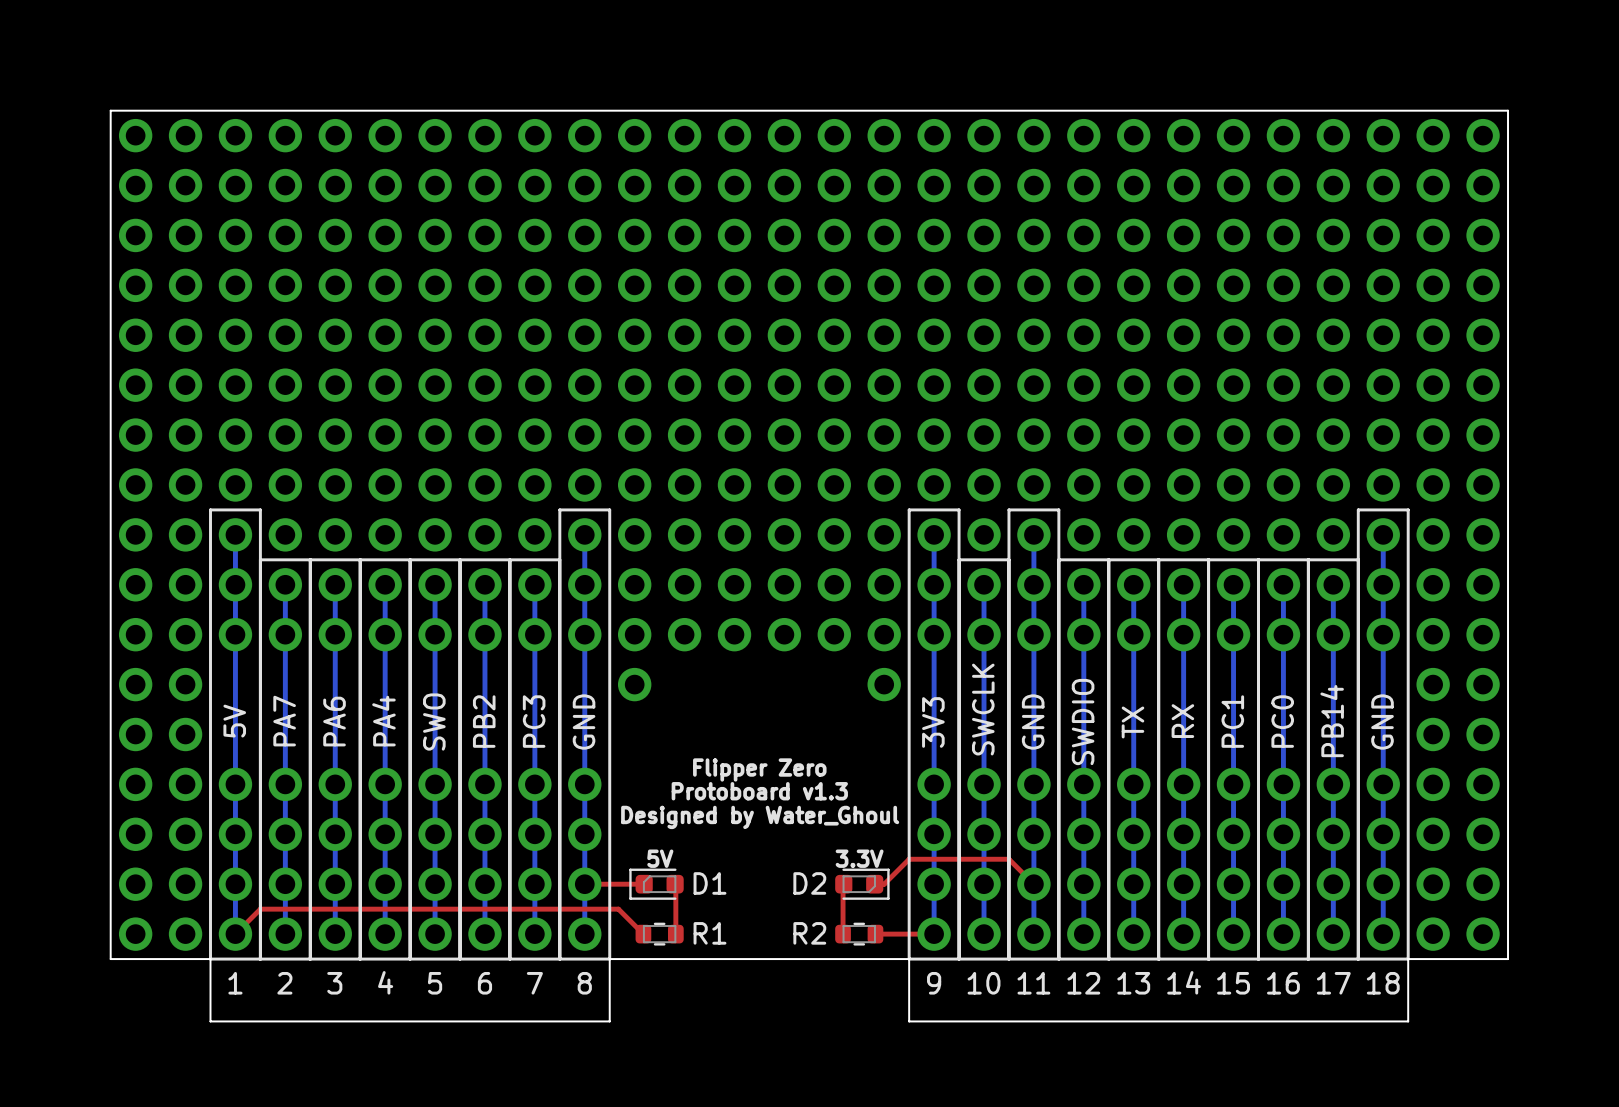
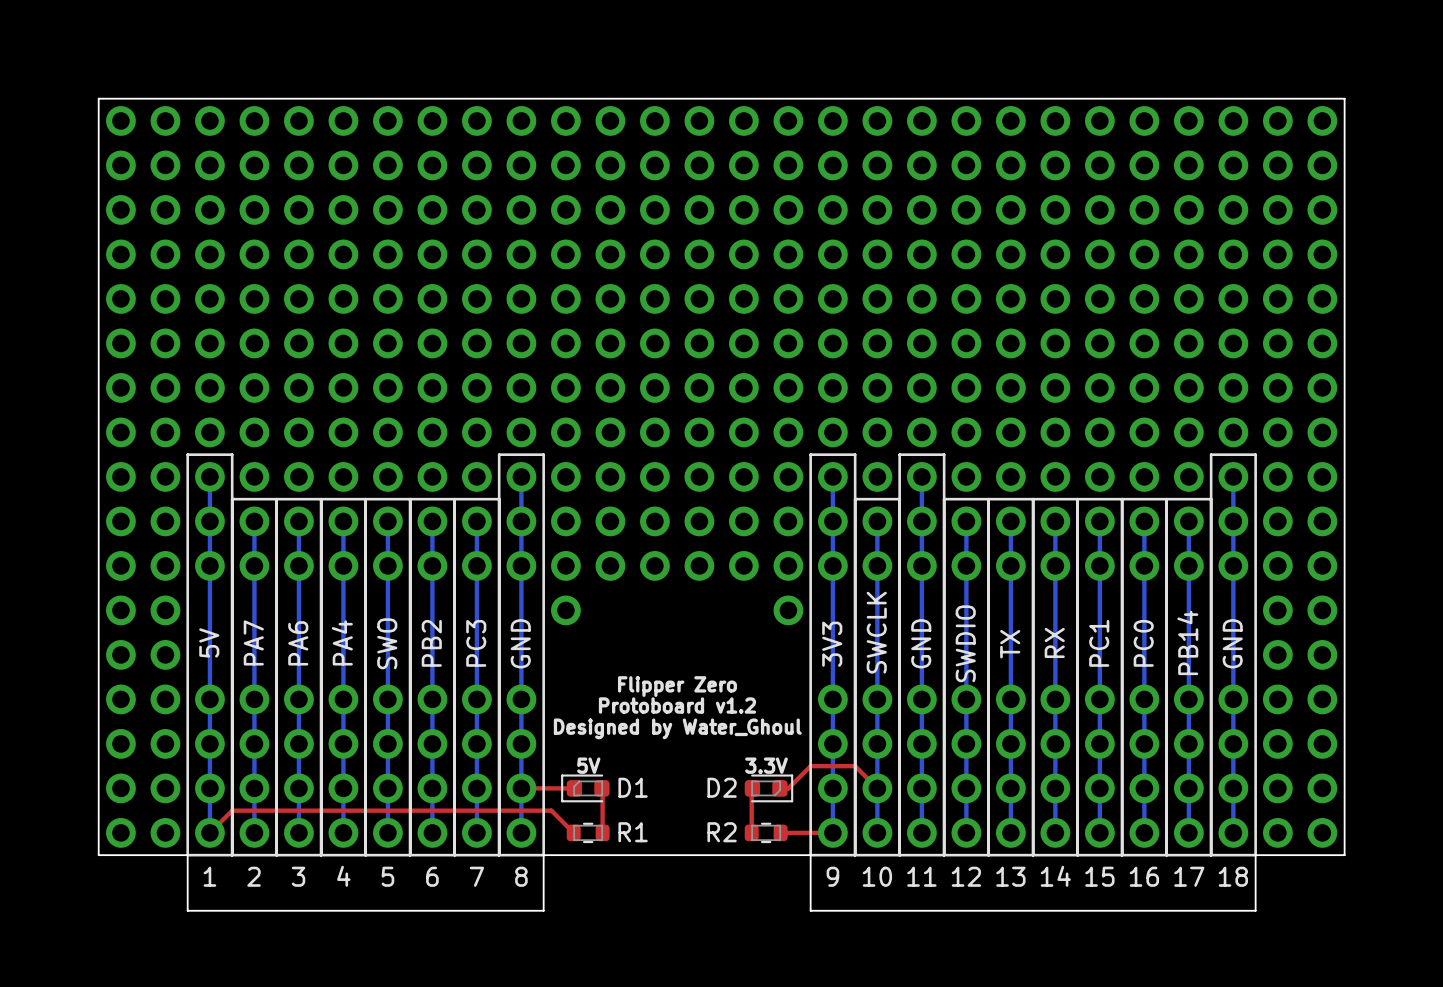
text: Protoboard v1.3 (759, 791) -> Protoboard v1.2 (677, 705)
top track: (959, 859) (1008, 859) (1033, 884) -> (855, 766) (877, 788)

